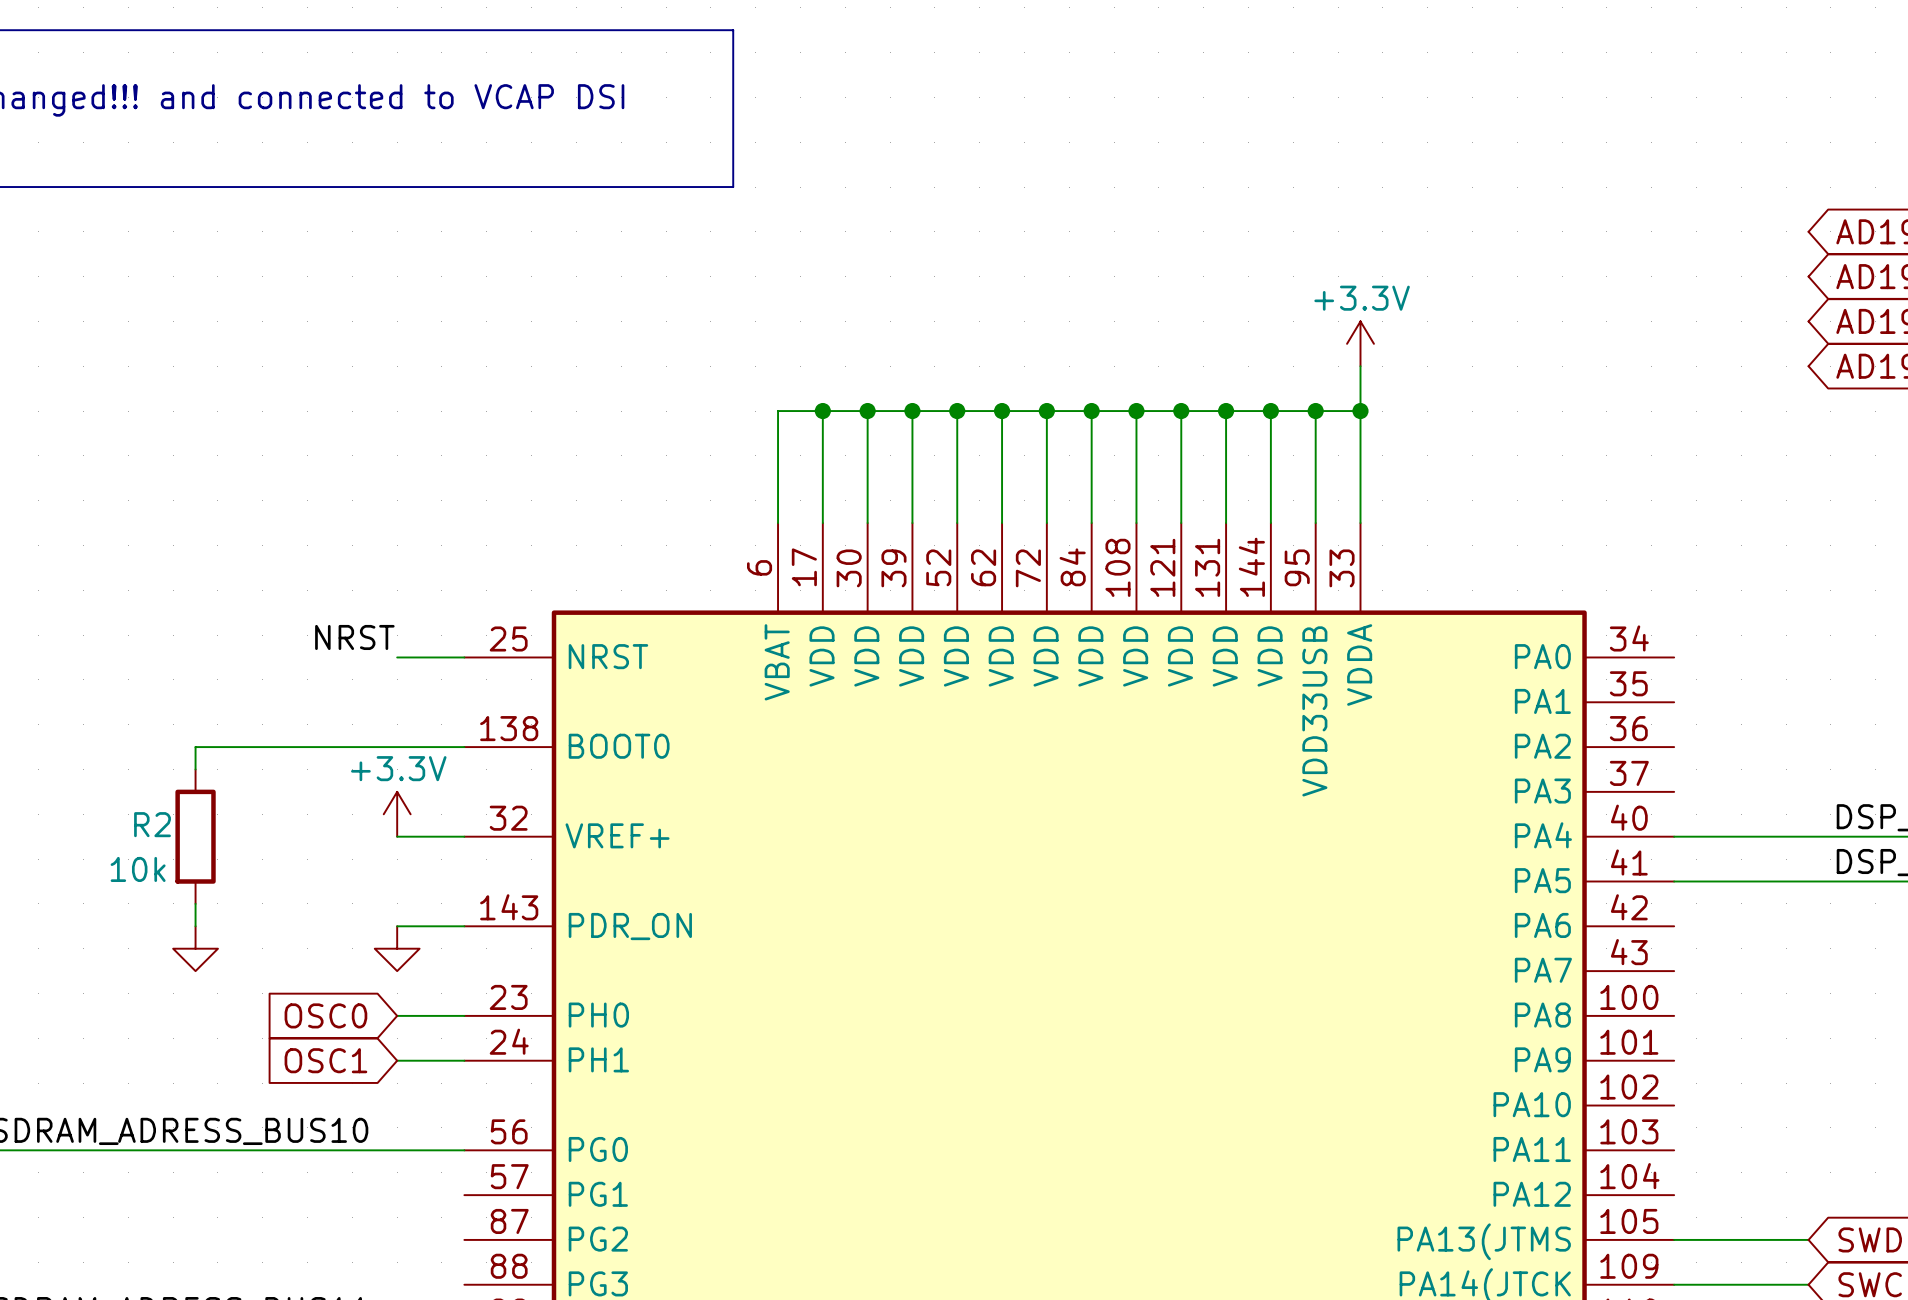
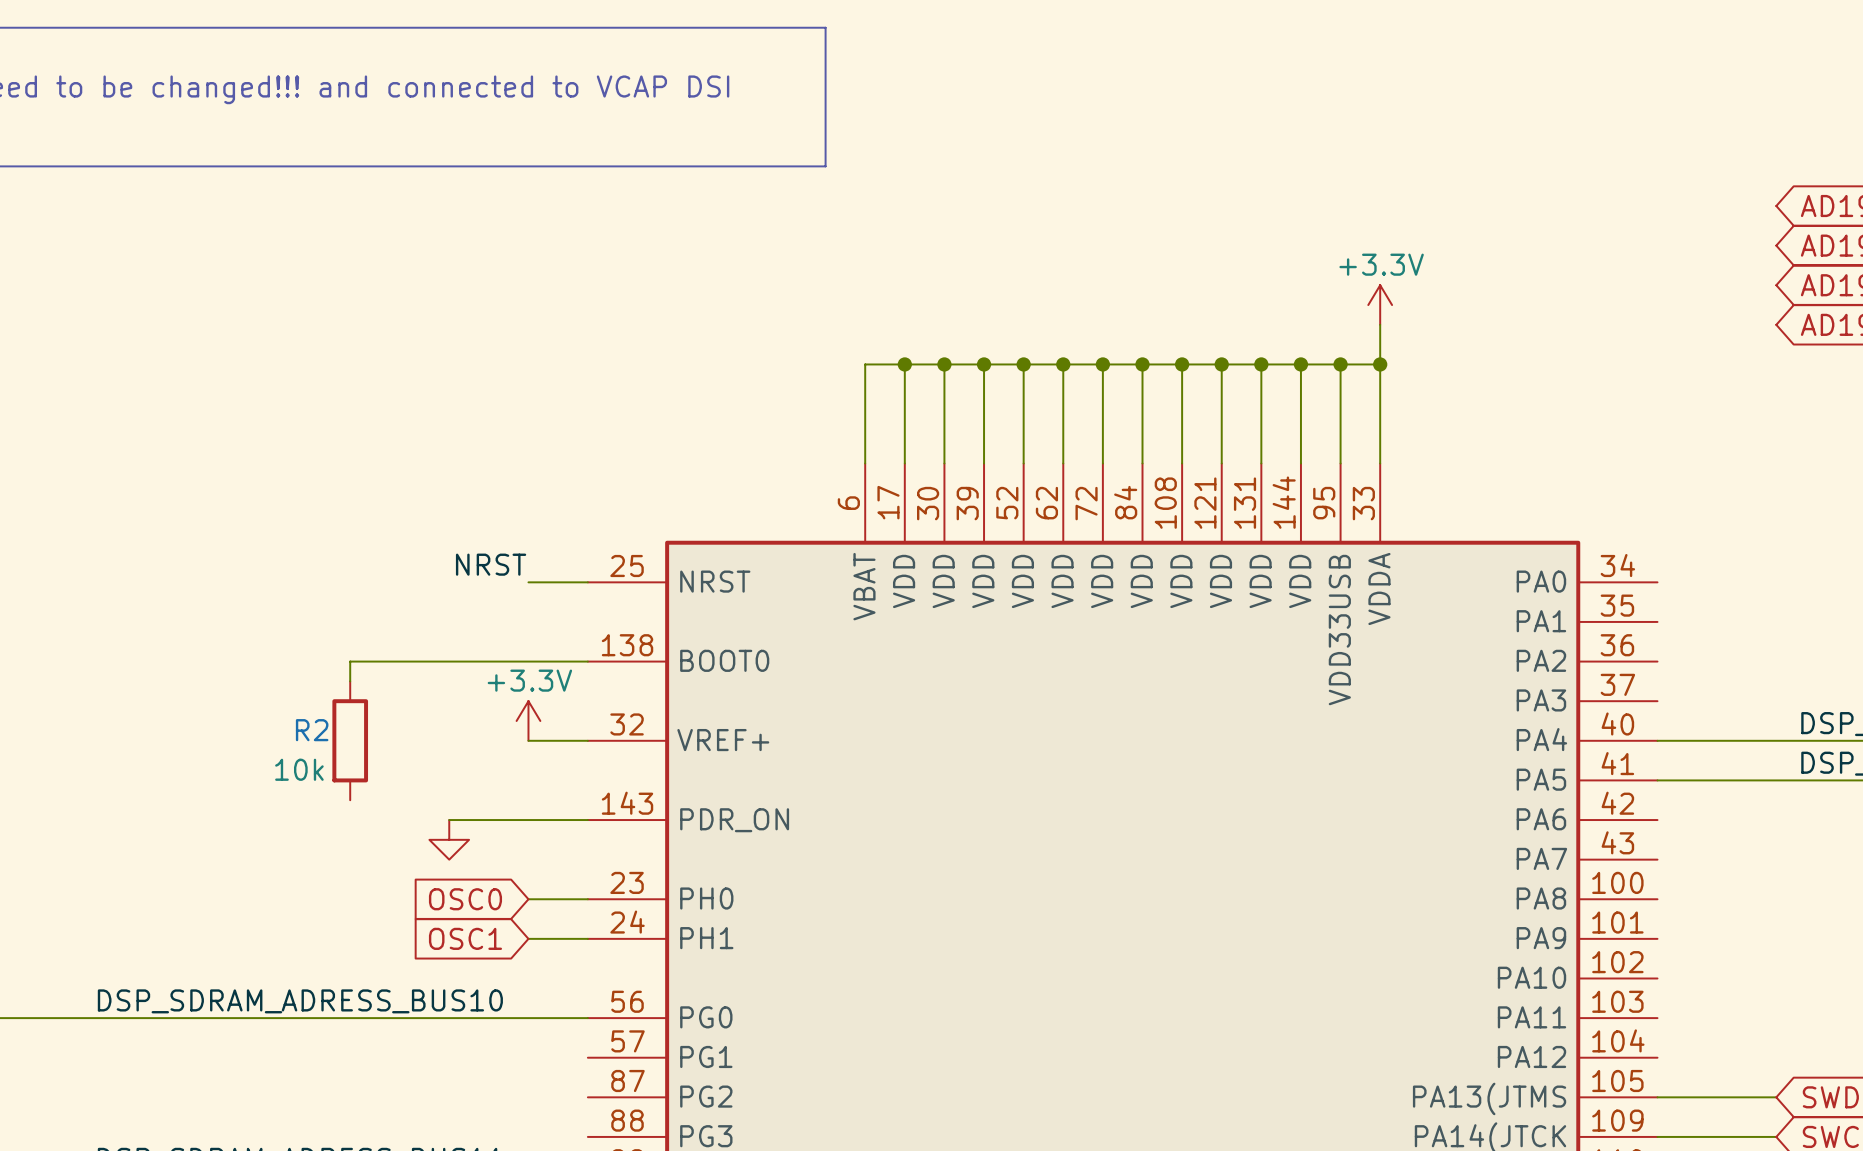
wire: (195, 903) (195, 926) -> none
wire: none -> (449, 820) (528, 820)
power symbol: (195, 948) -> none
power symbol: none -> (449, 839)
power symbol: (397, 948) -> none

